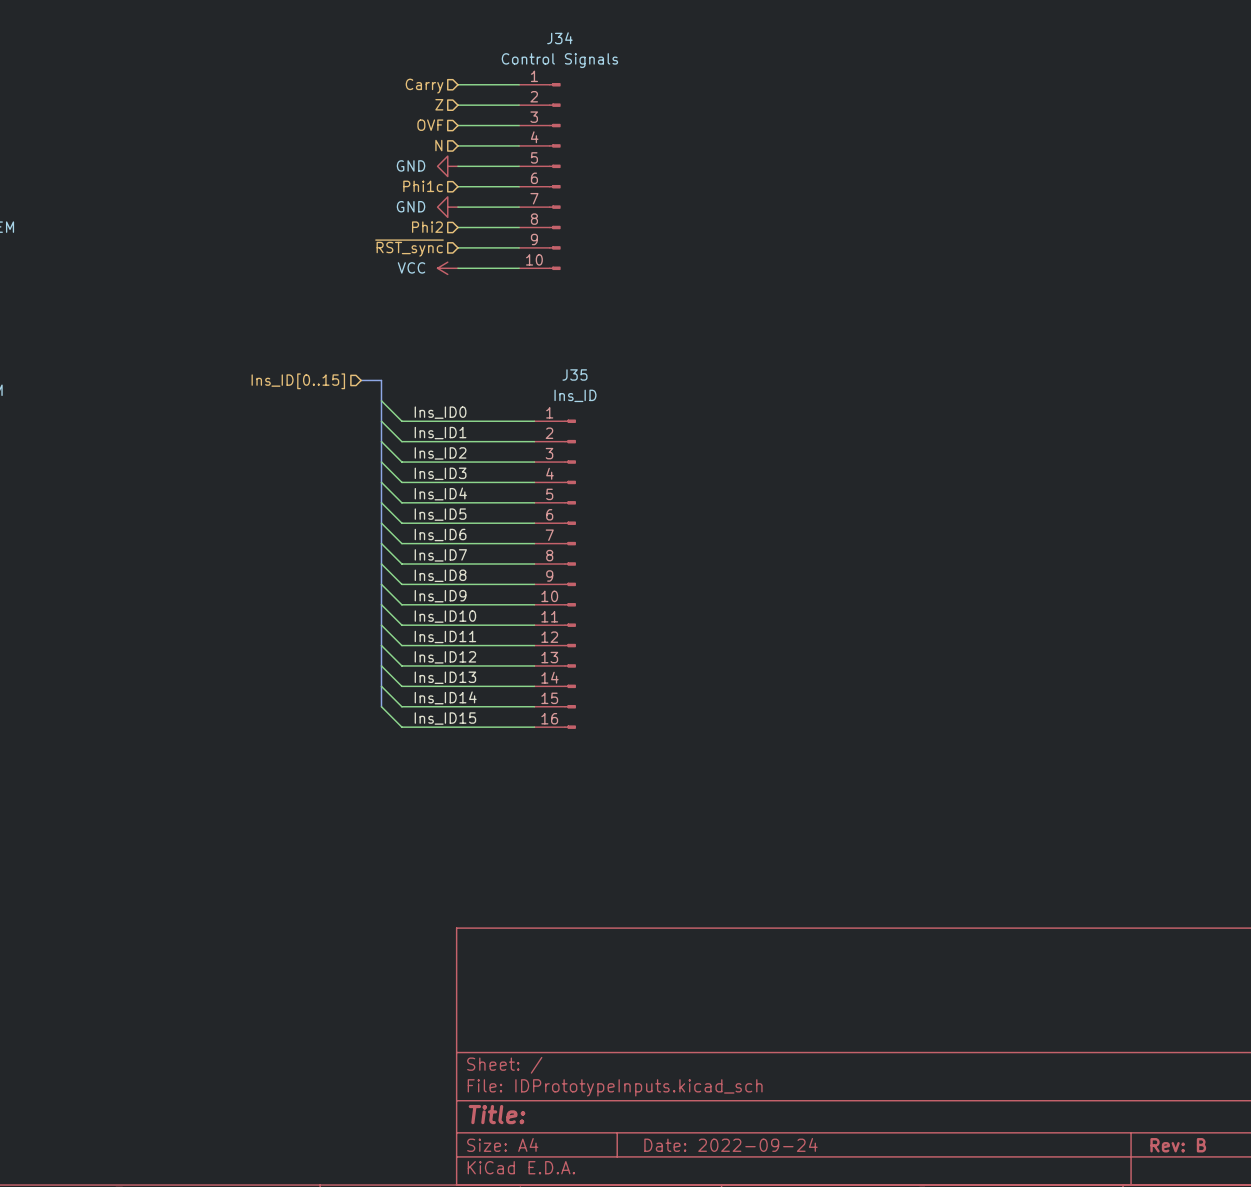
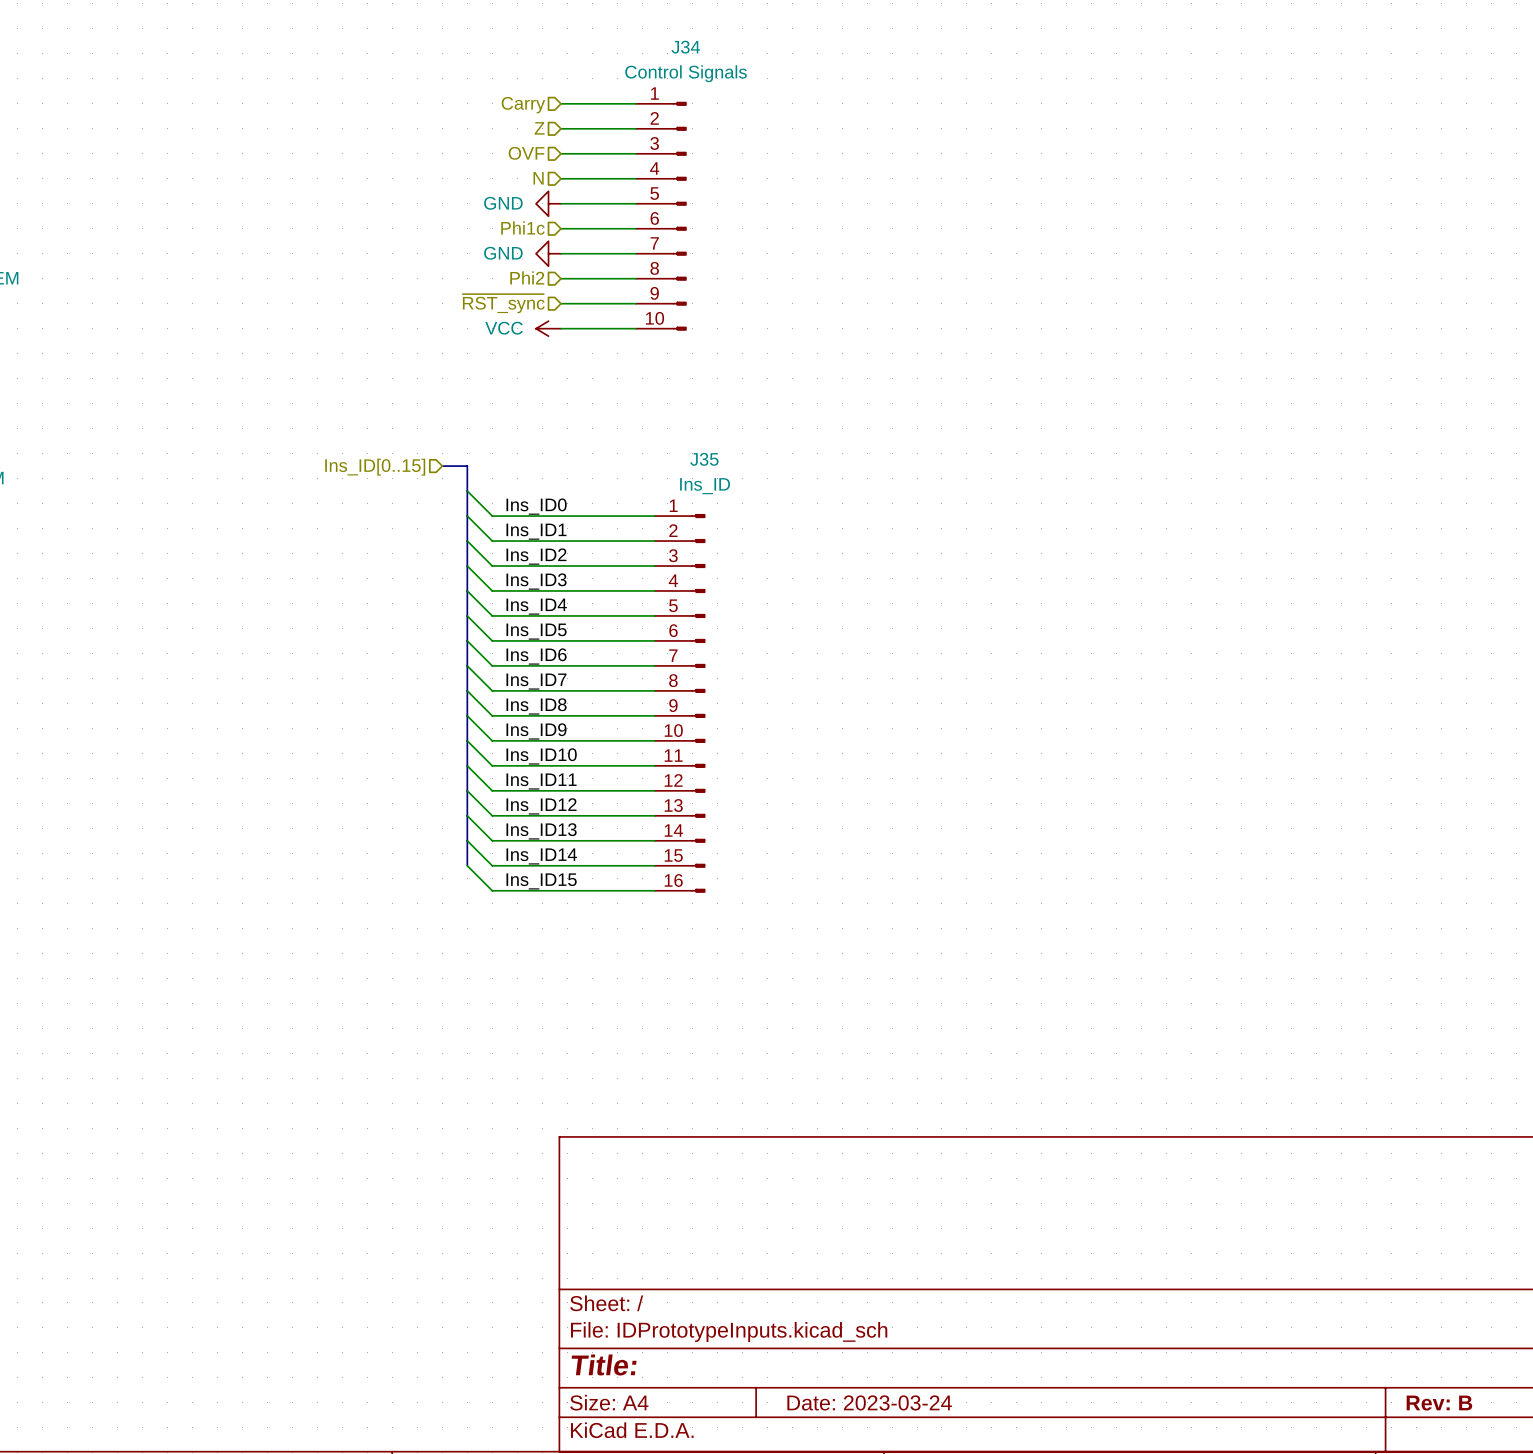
title block: Date: 2022-09-24 (730, 1144) -> Date: 2023-03-24 (869, 1402)

